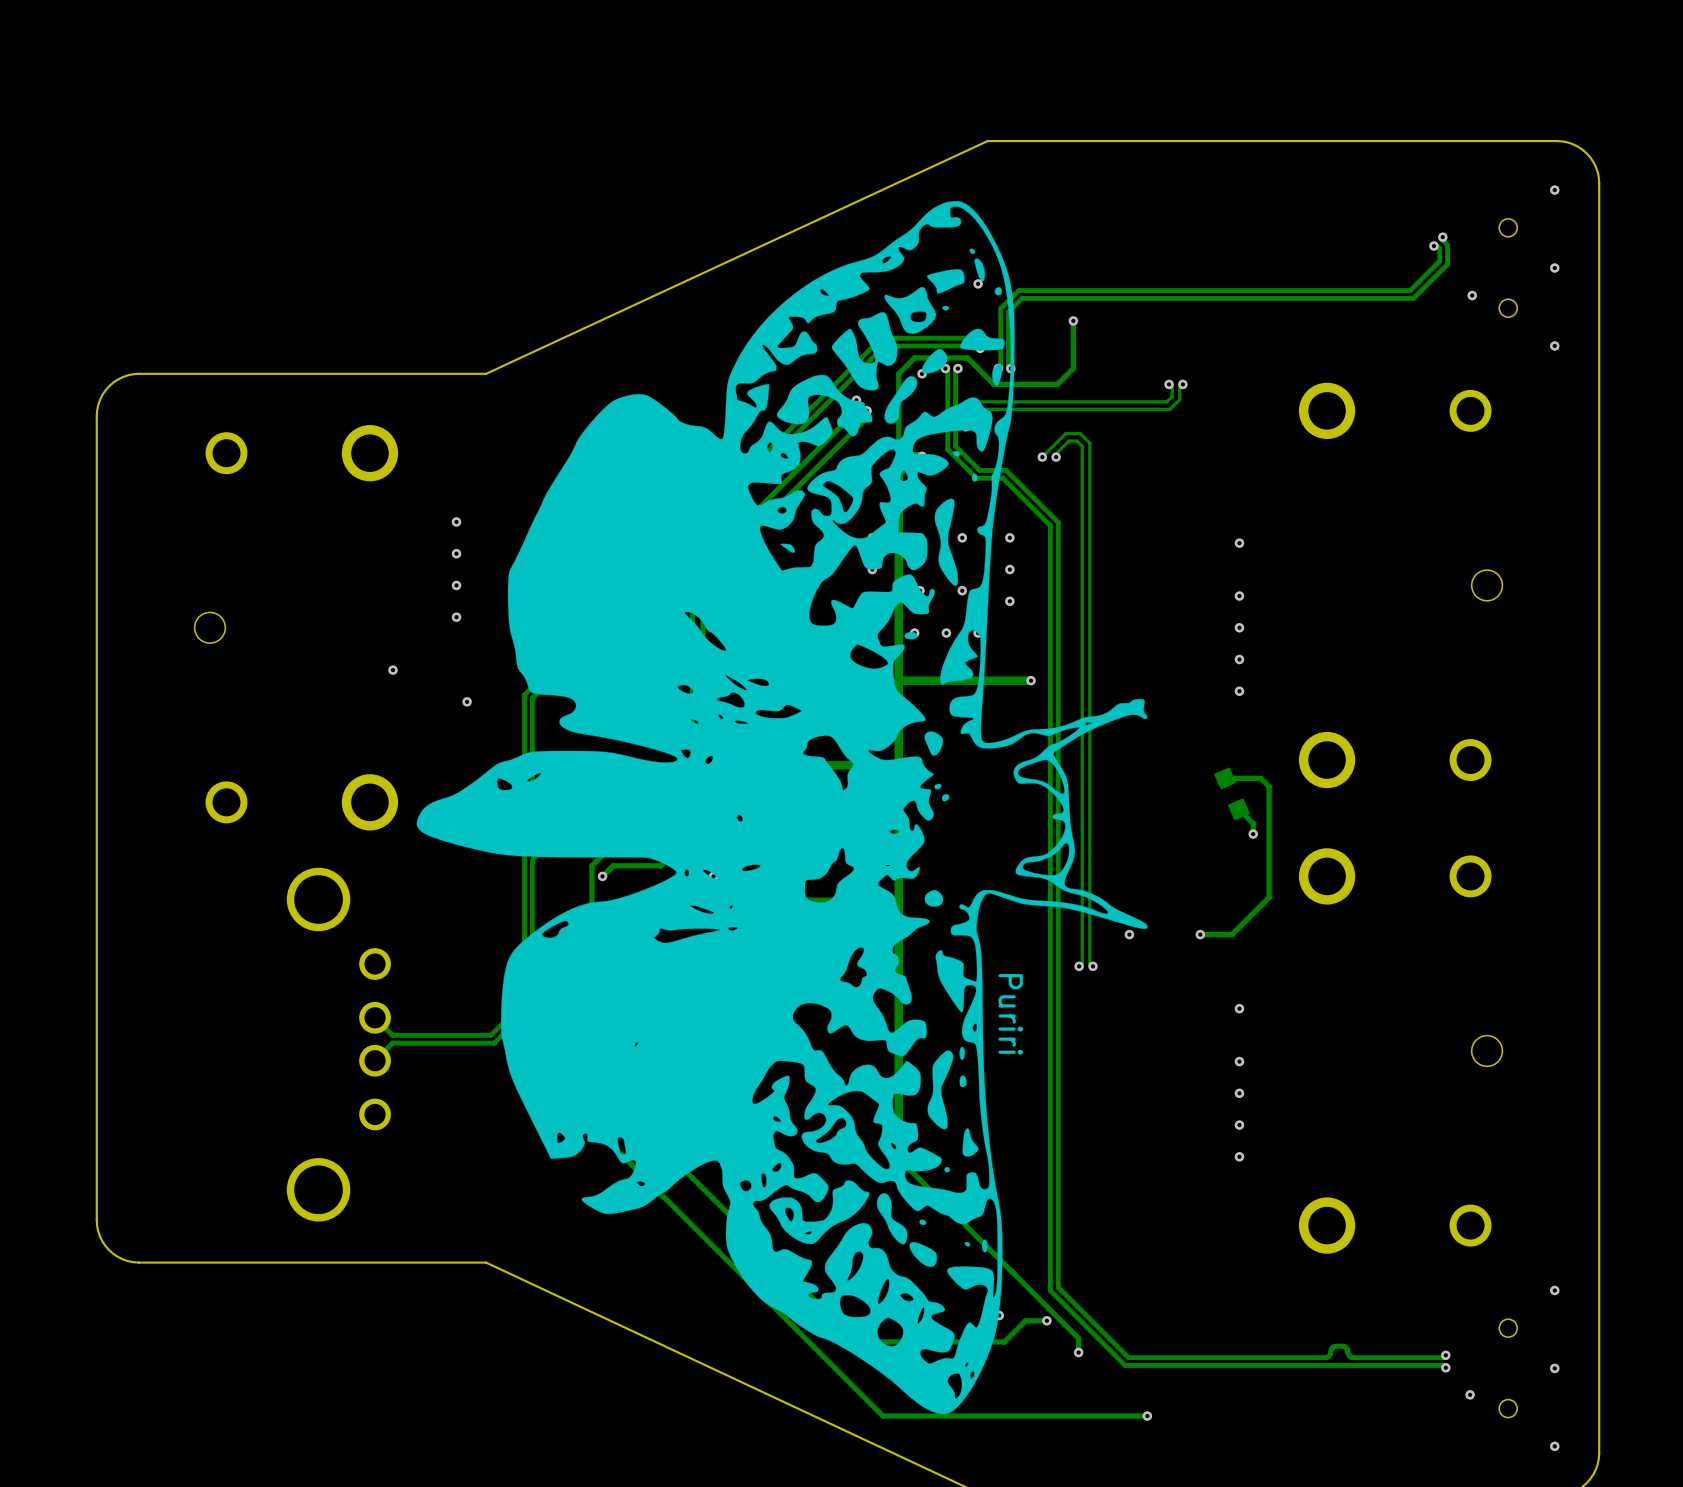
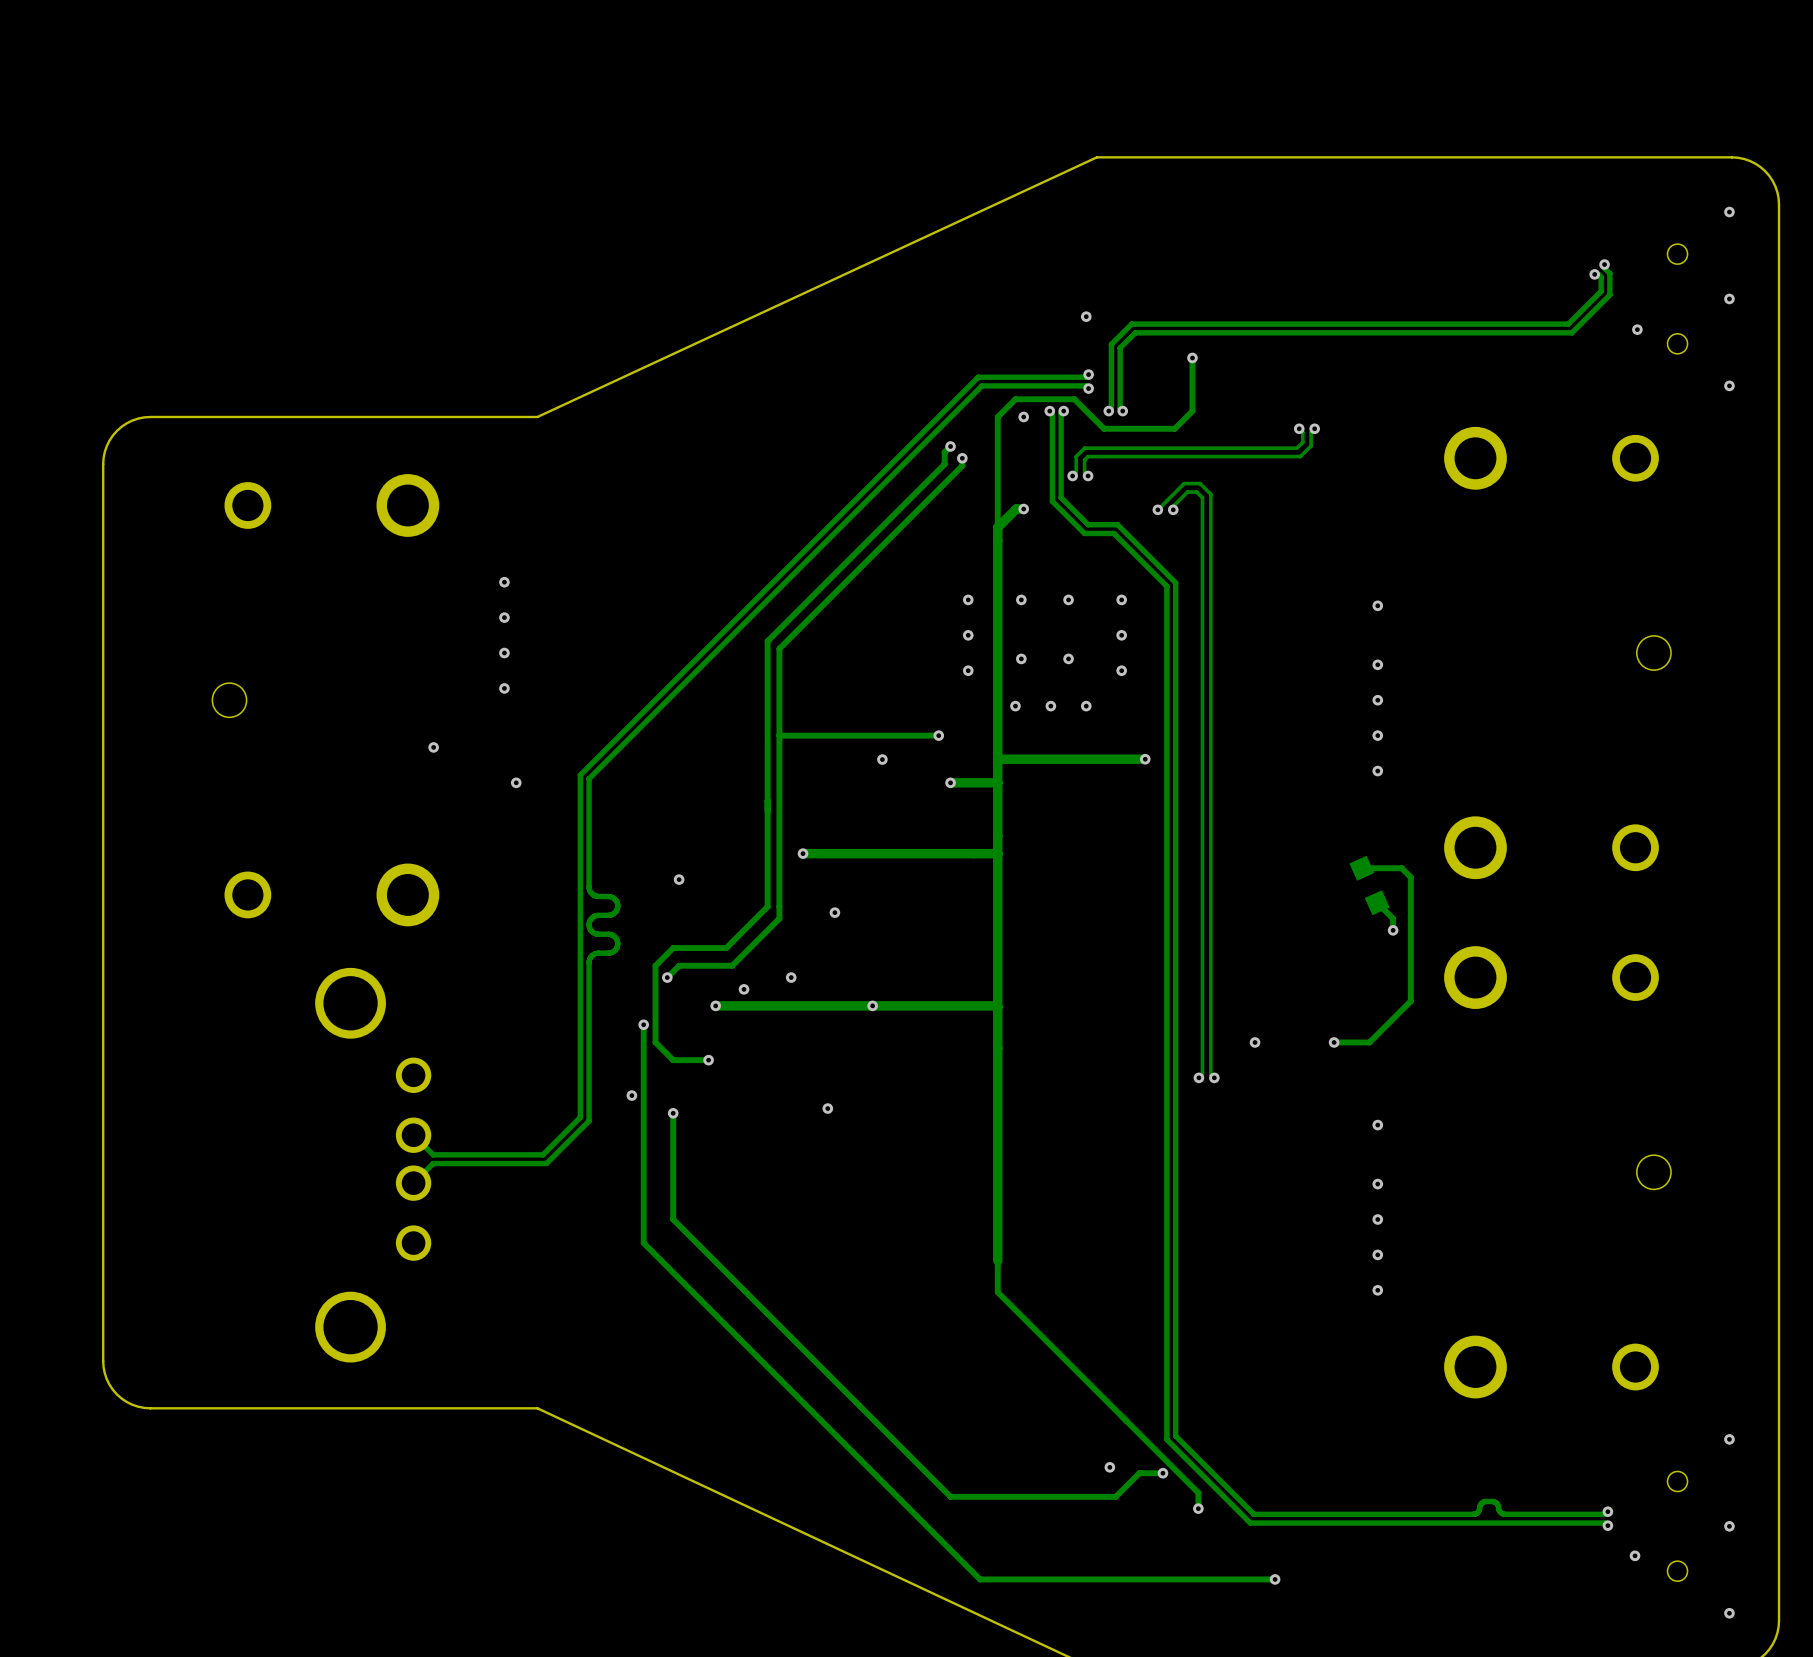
drawing: [416, 201, 1148, 1415] -> none
text: Puriri (1010, 1014) -> none

